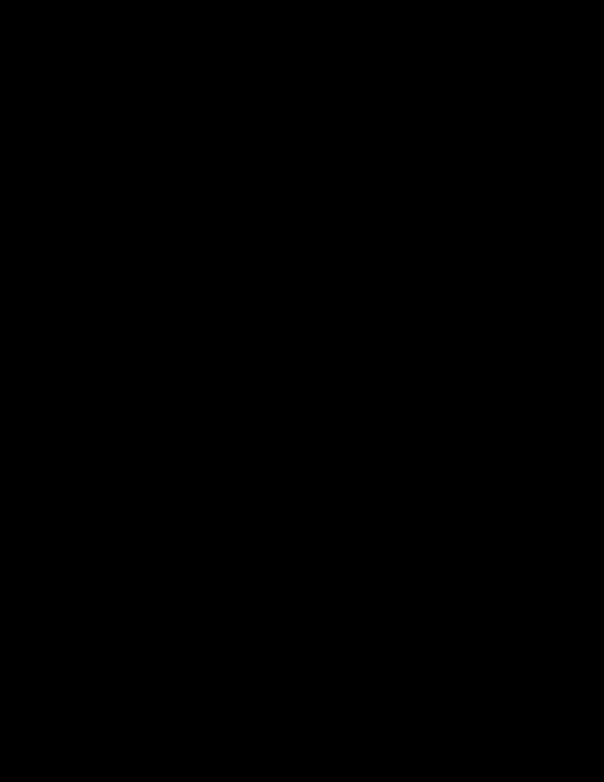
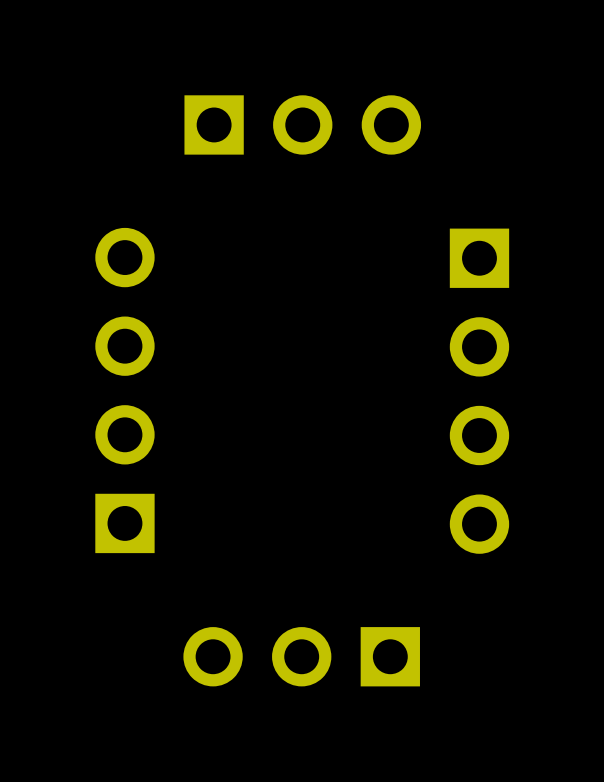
part: none -> (302, 124)
part: none -> (124, 390)
part: none -> (479, 391)
part: none -> (301, 656)

